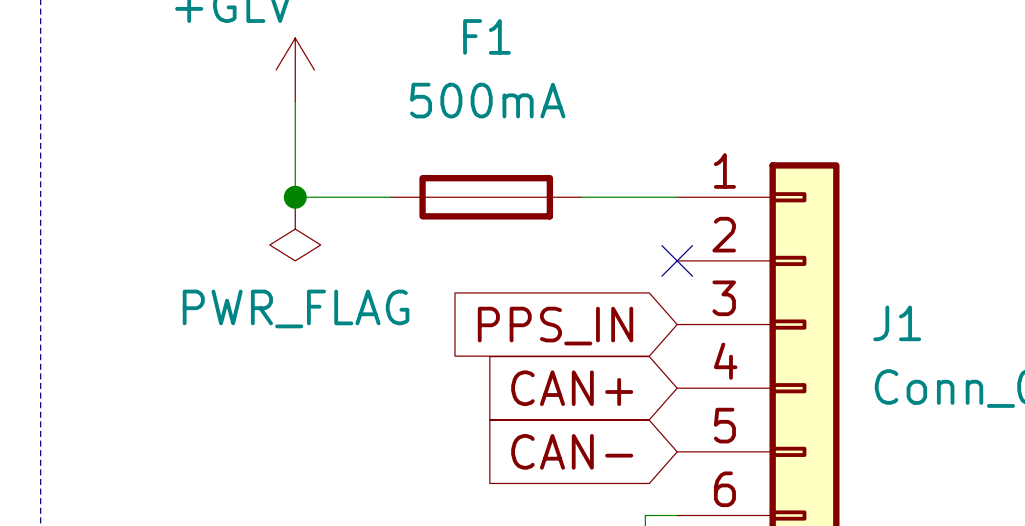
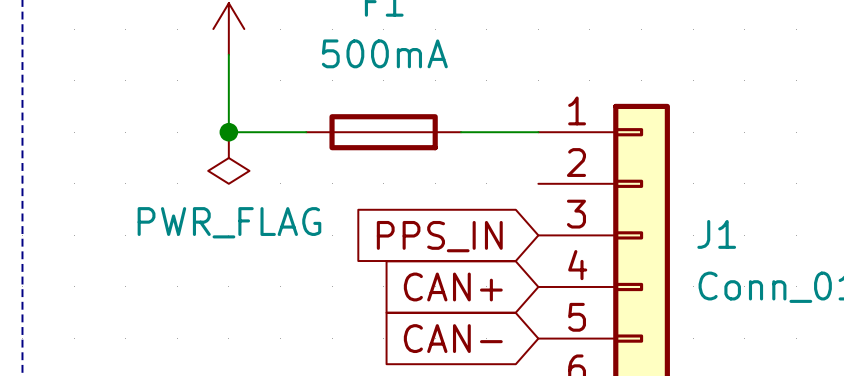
no-connect mark: (677, 260) -> none

